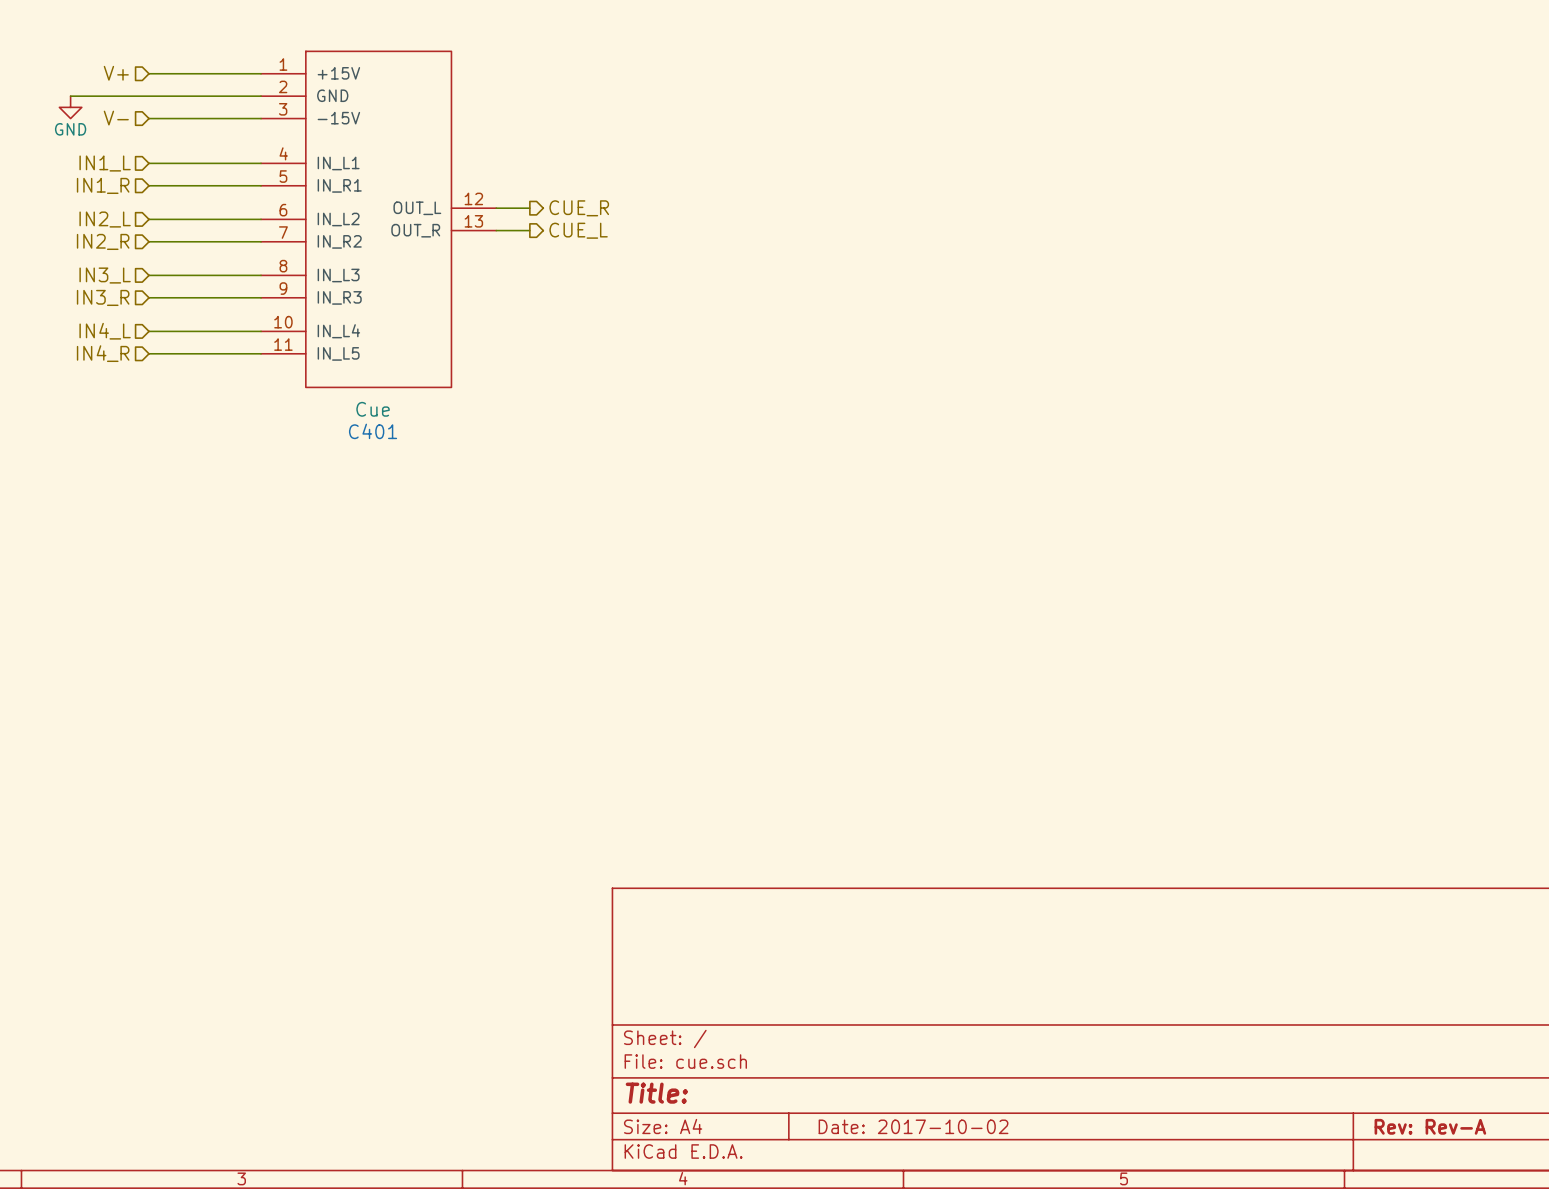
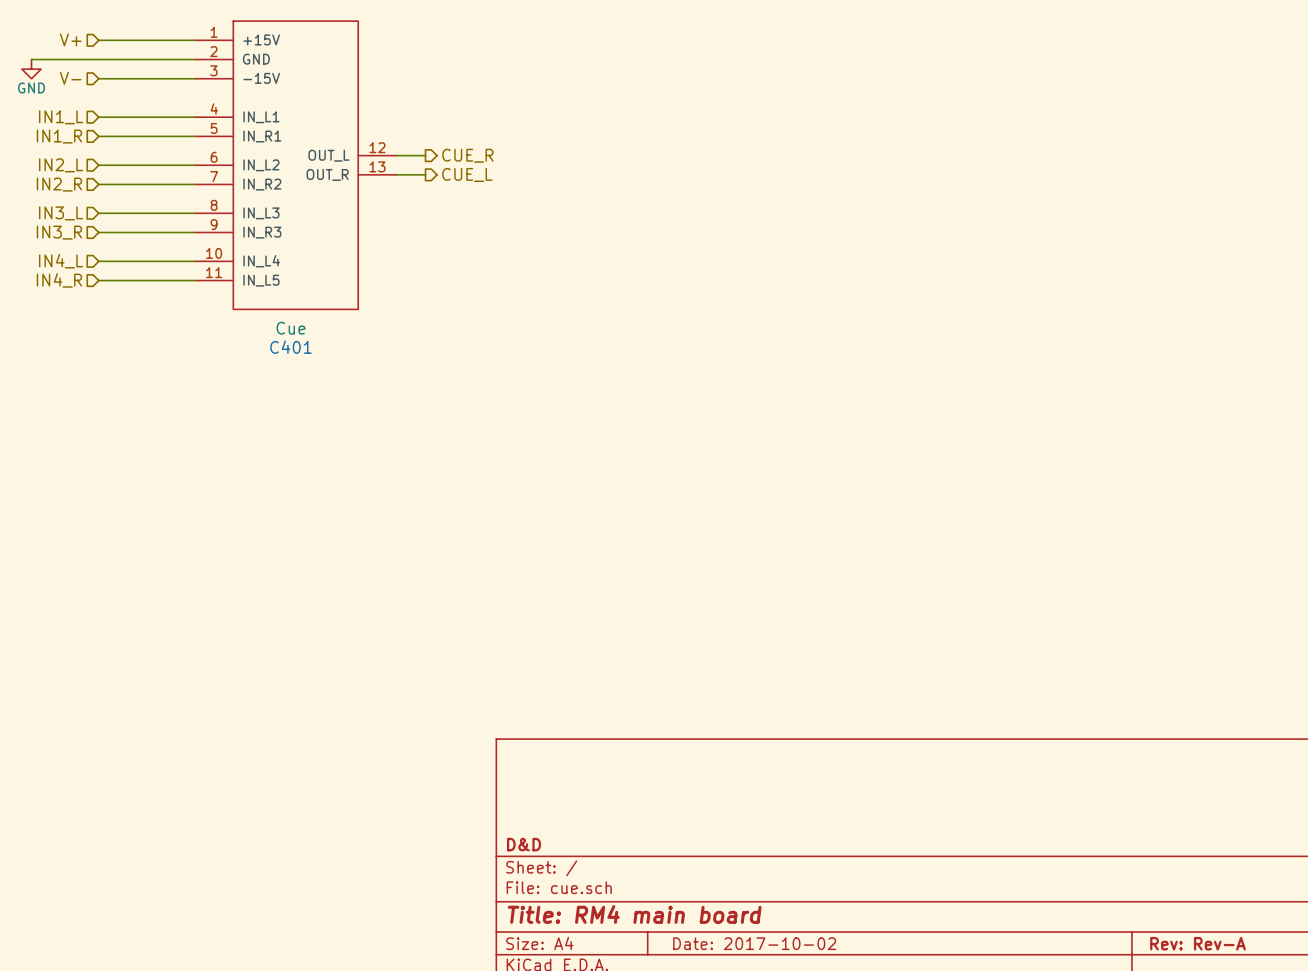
title block: none -> D&D (524, 844)
title block: Title: (656, 1093) -> Title: RM4 main board (634, 914)

